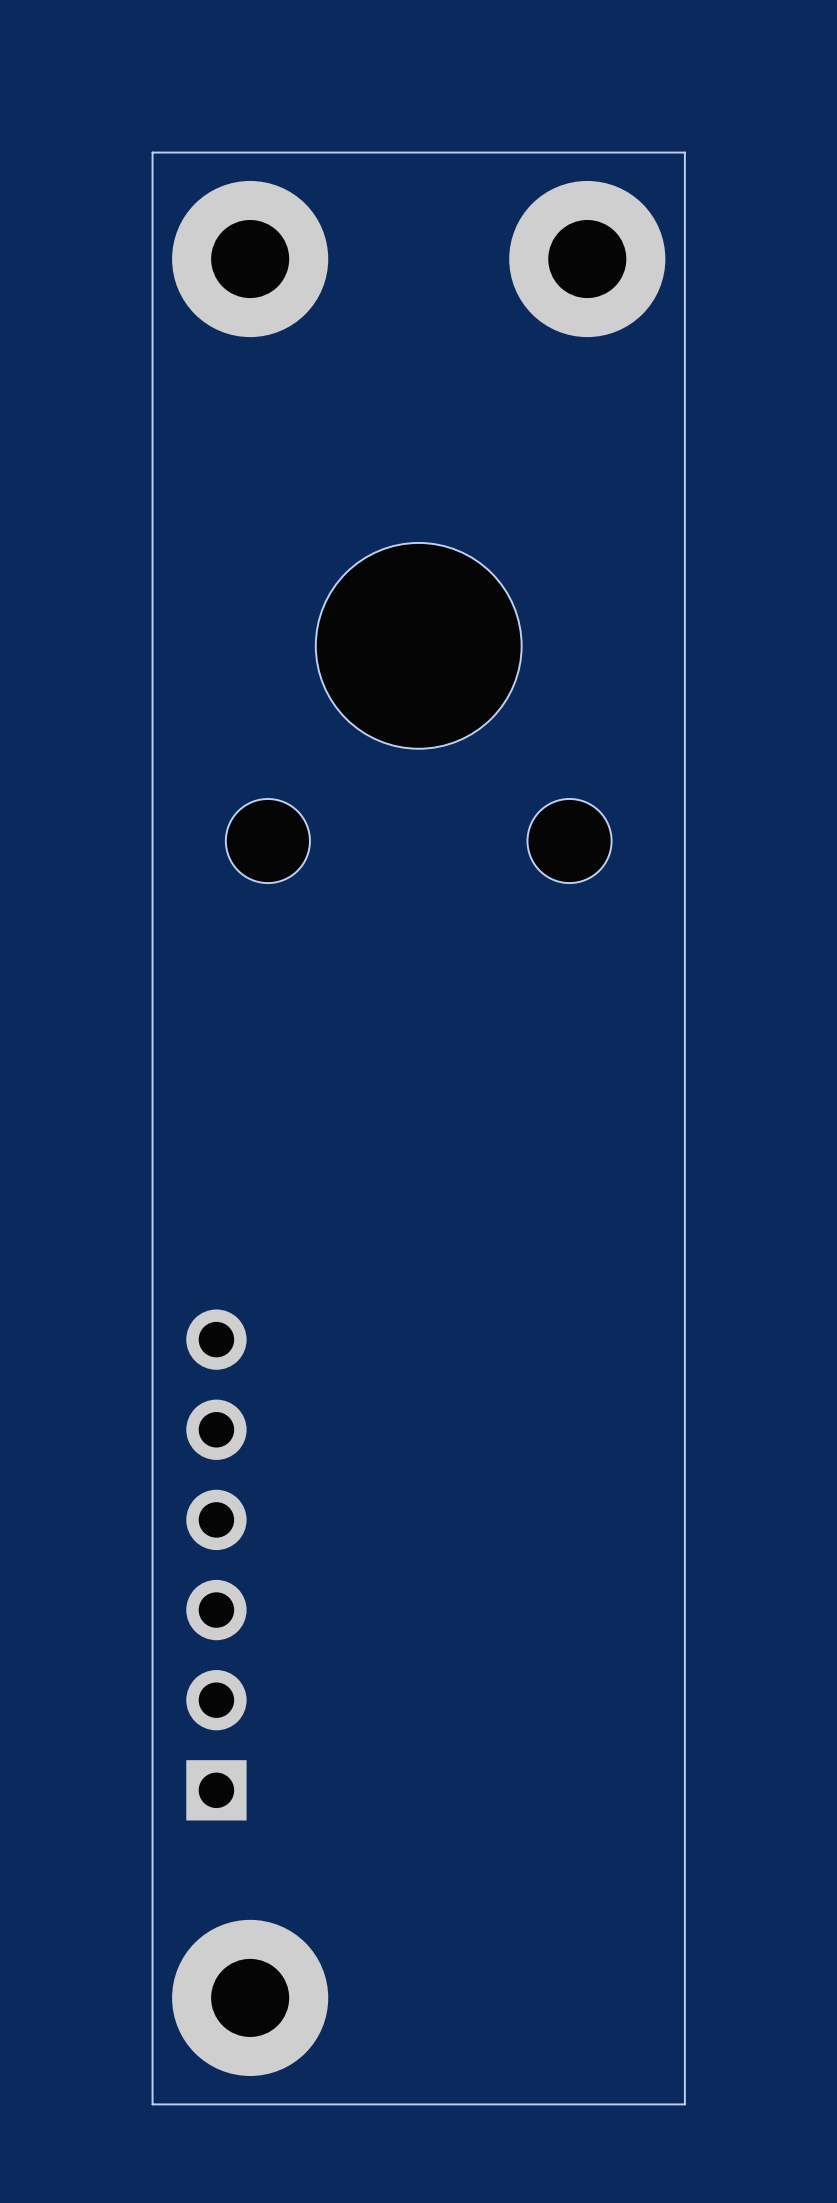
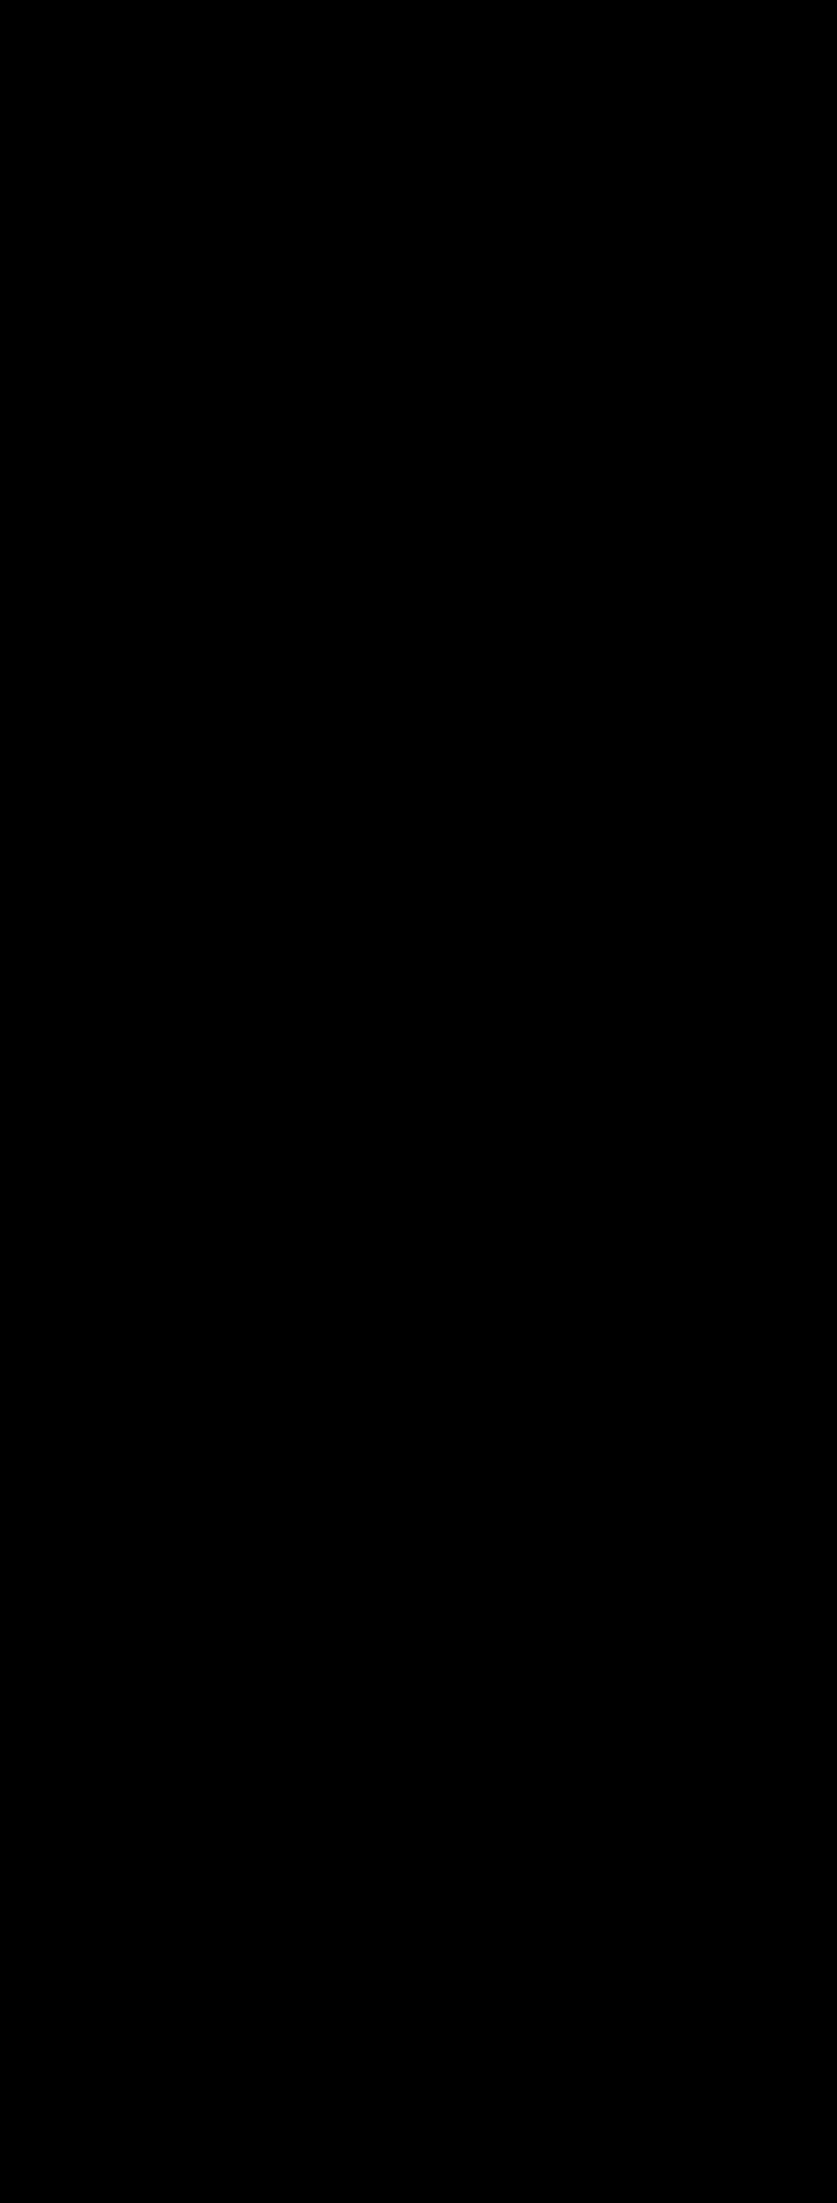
board edge: (684, 152) (152, 152) (152, 2104) (684, 2104) (684, 152) -> none
part: (250, 259) -> none
part: (587, 259) -> none
part: (418, 713) -> none
part: (216, 1564) -> none
part: (250, 1997) -> none

